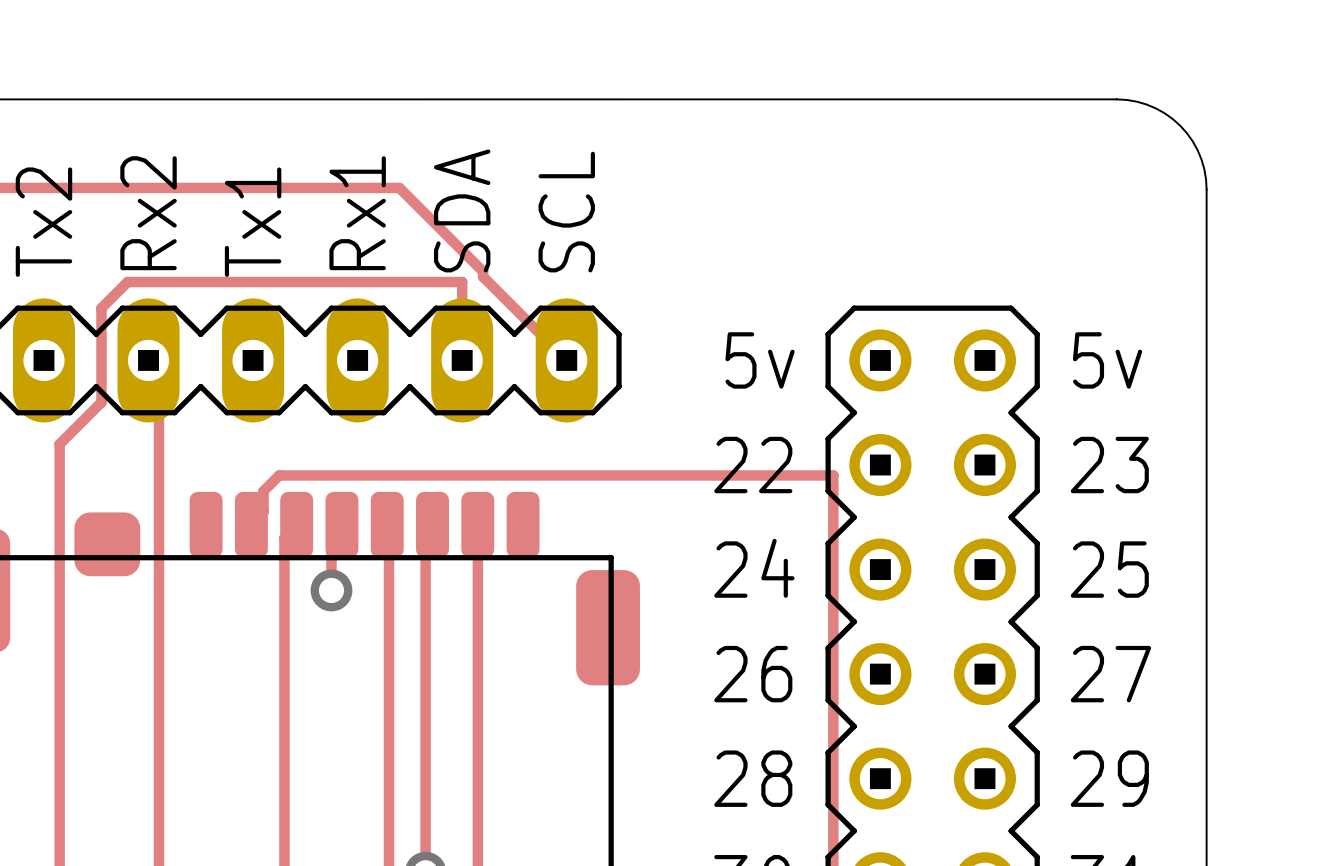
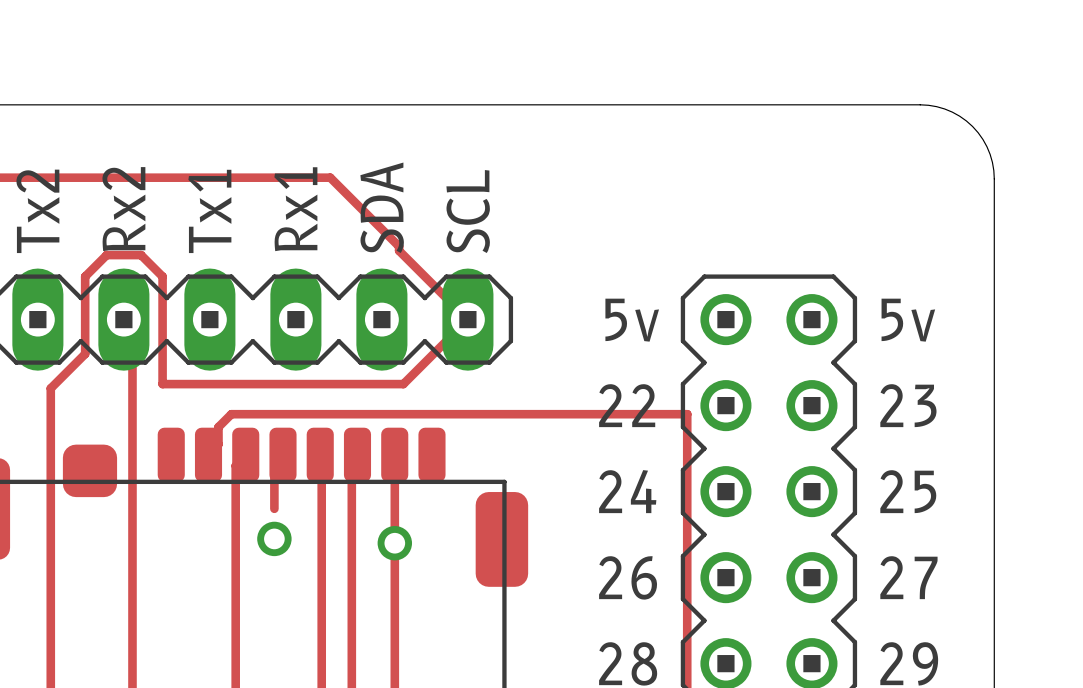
track: (169, 282) (462, 282) (462, 360) -> (141, 255) (162, 276) (162, 384) (403, 384) (467, 319)
via position: (331, 590) -> (274, 538)
via: none -> (394, 543)

